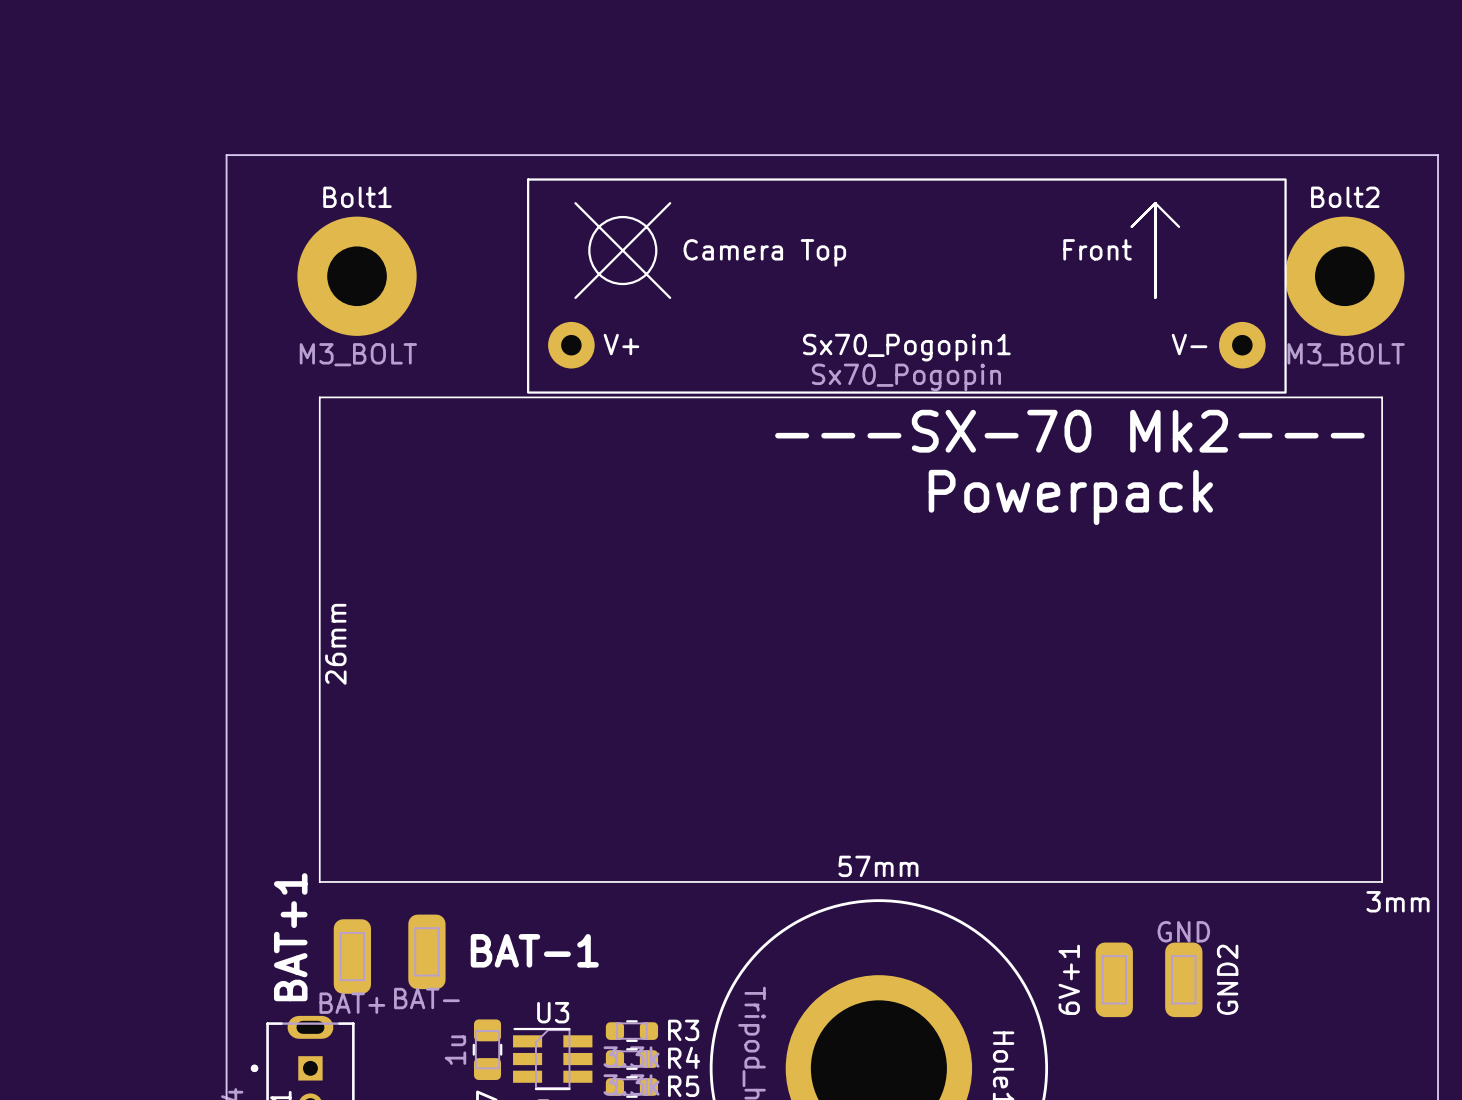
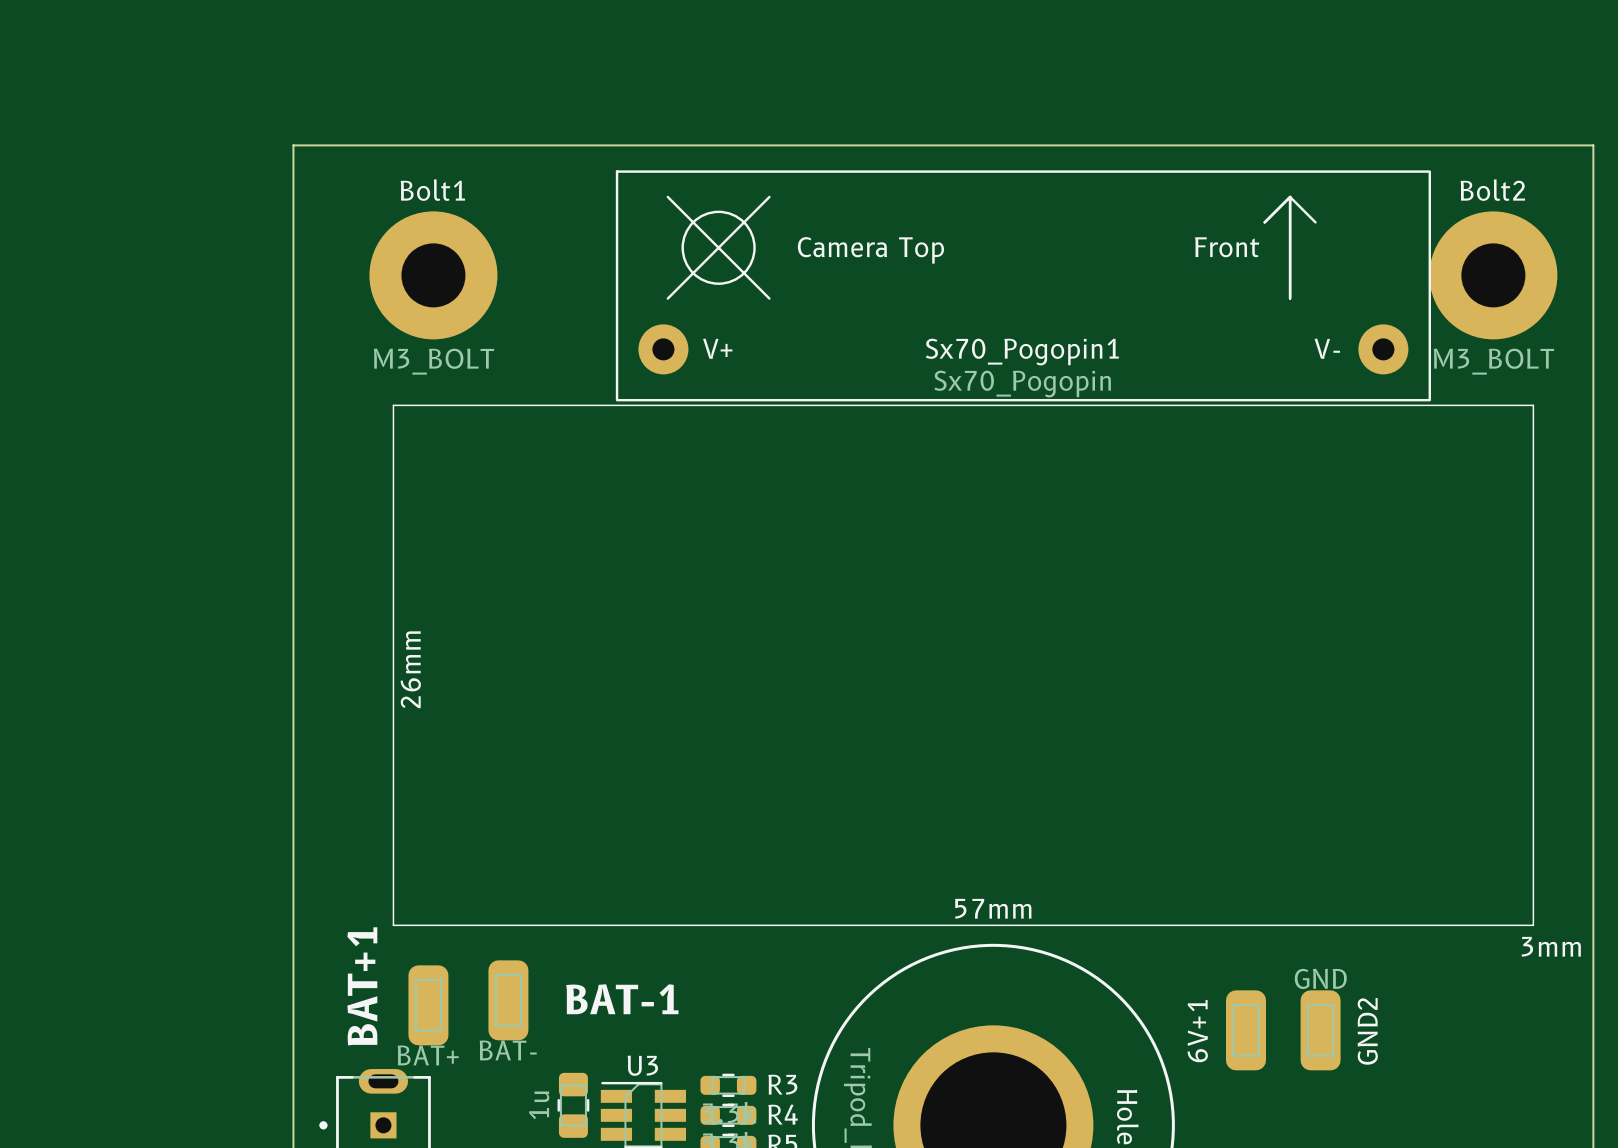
text: ---SX-70 Mk2--- (1069, 431) -> none
text: Powerpack (1070, 497) -> none

